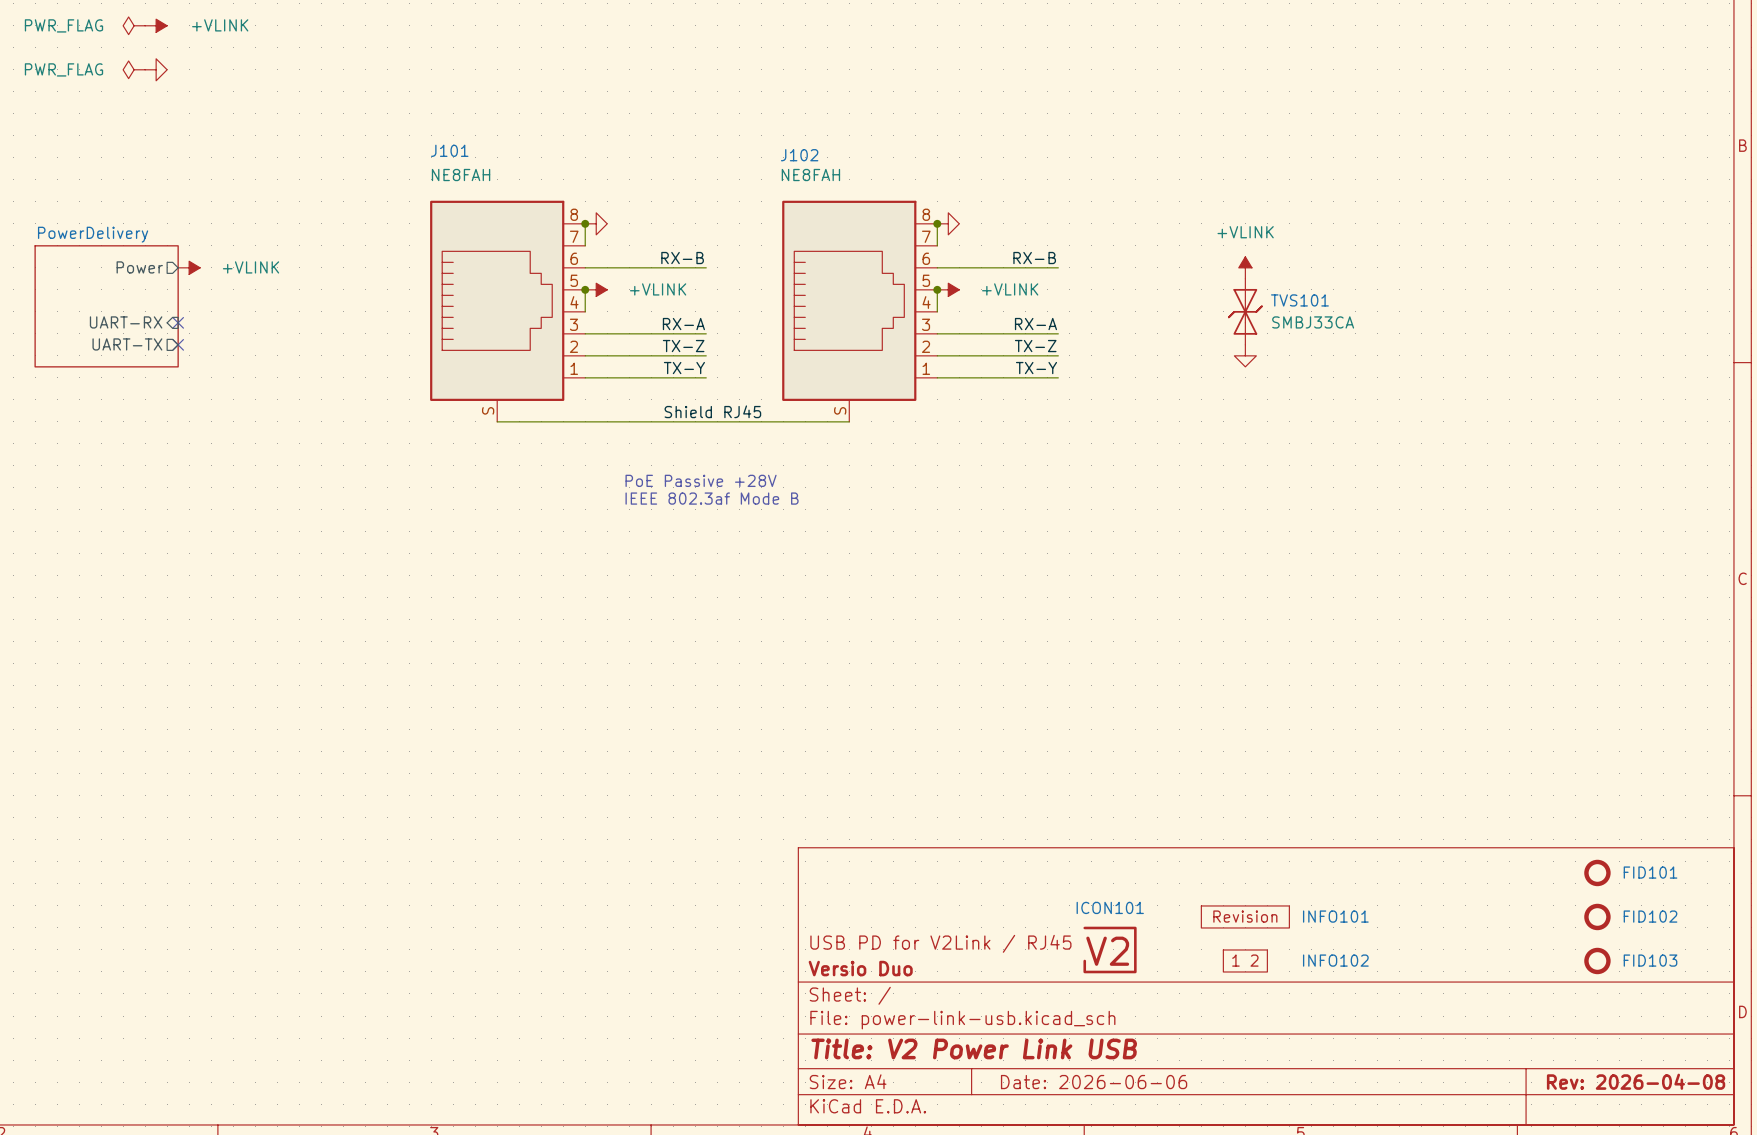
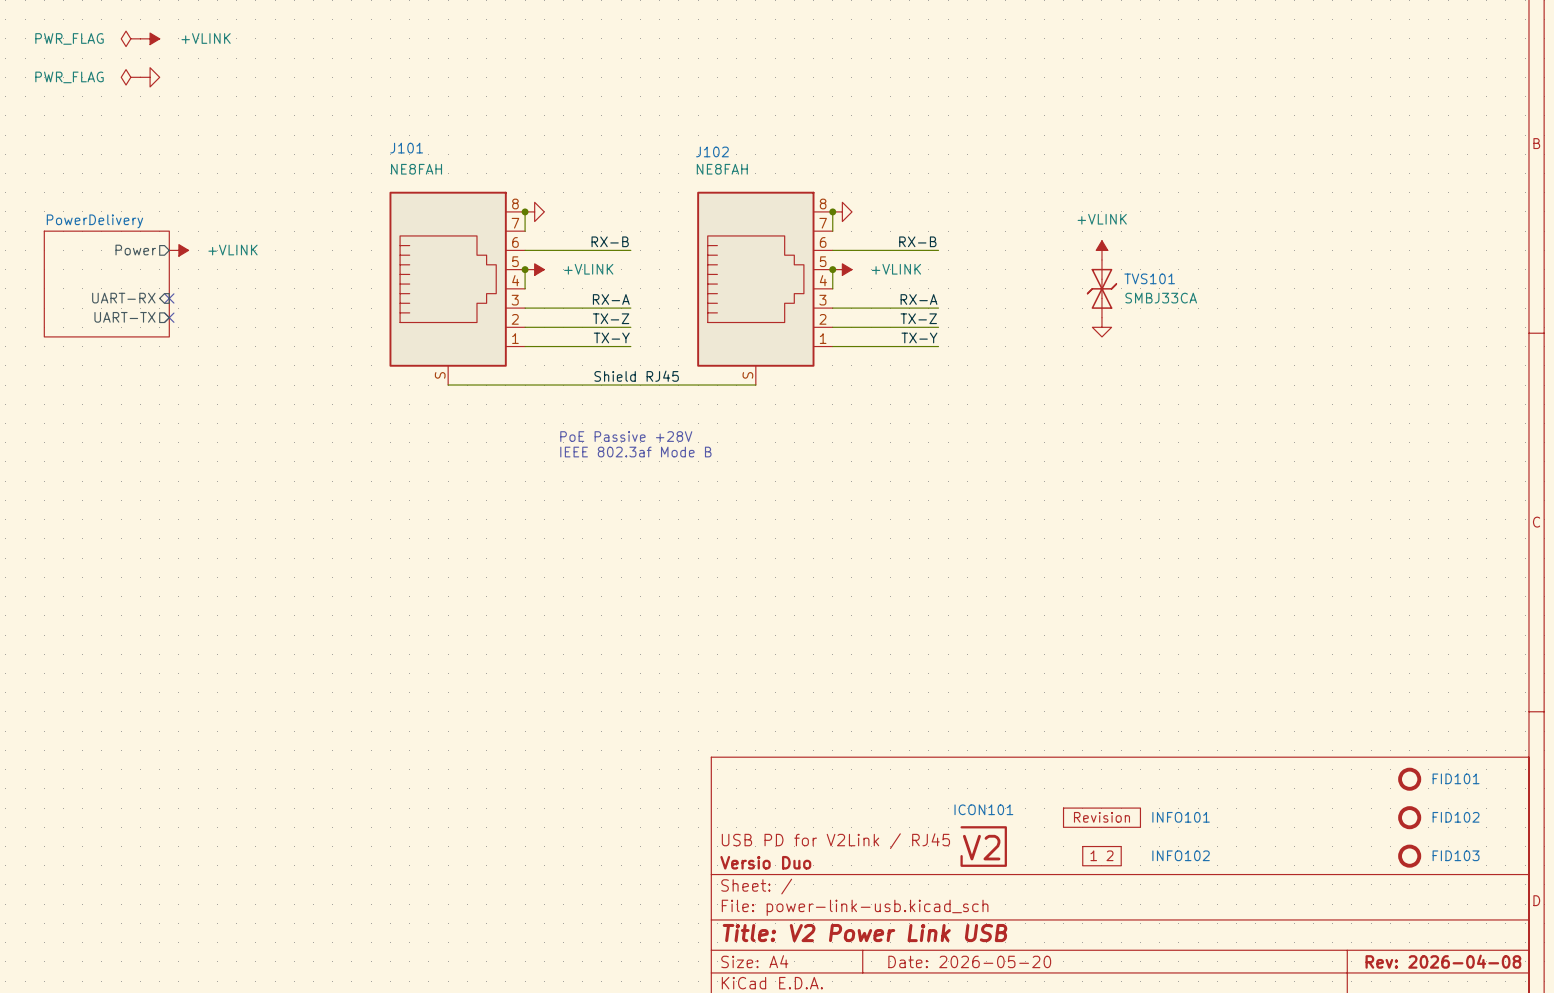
title block: Date: 2026-06-06 (1094, 1082) -> Date: 2026-05-20 (969, 961)

